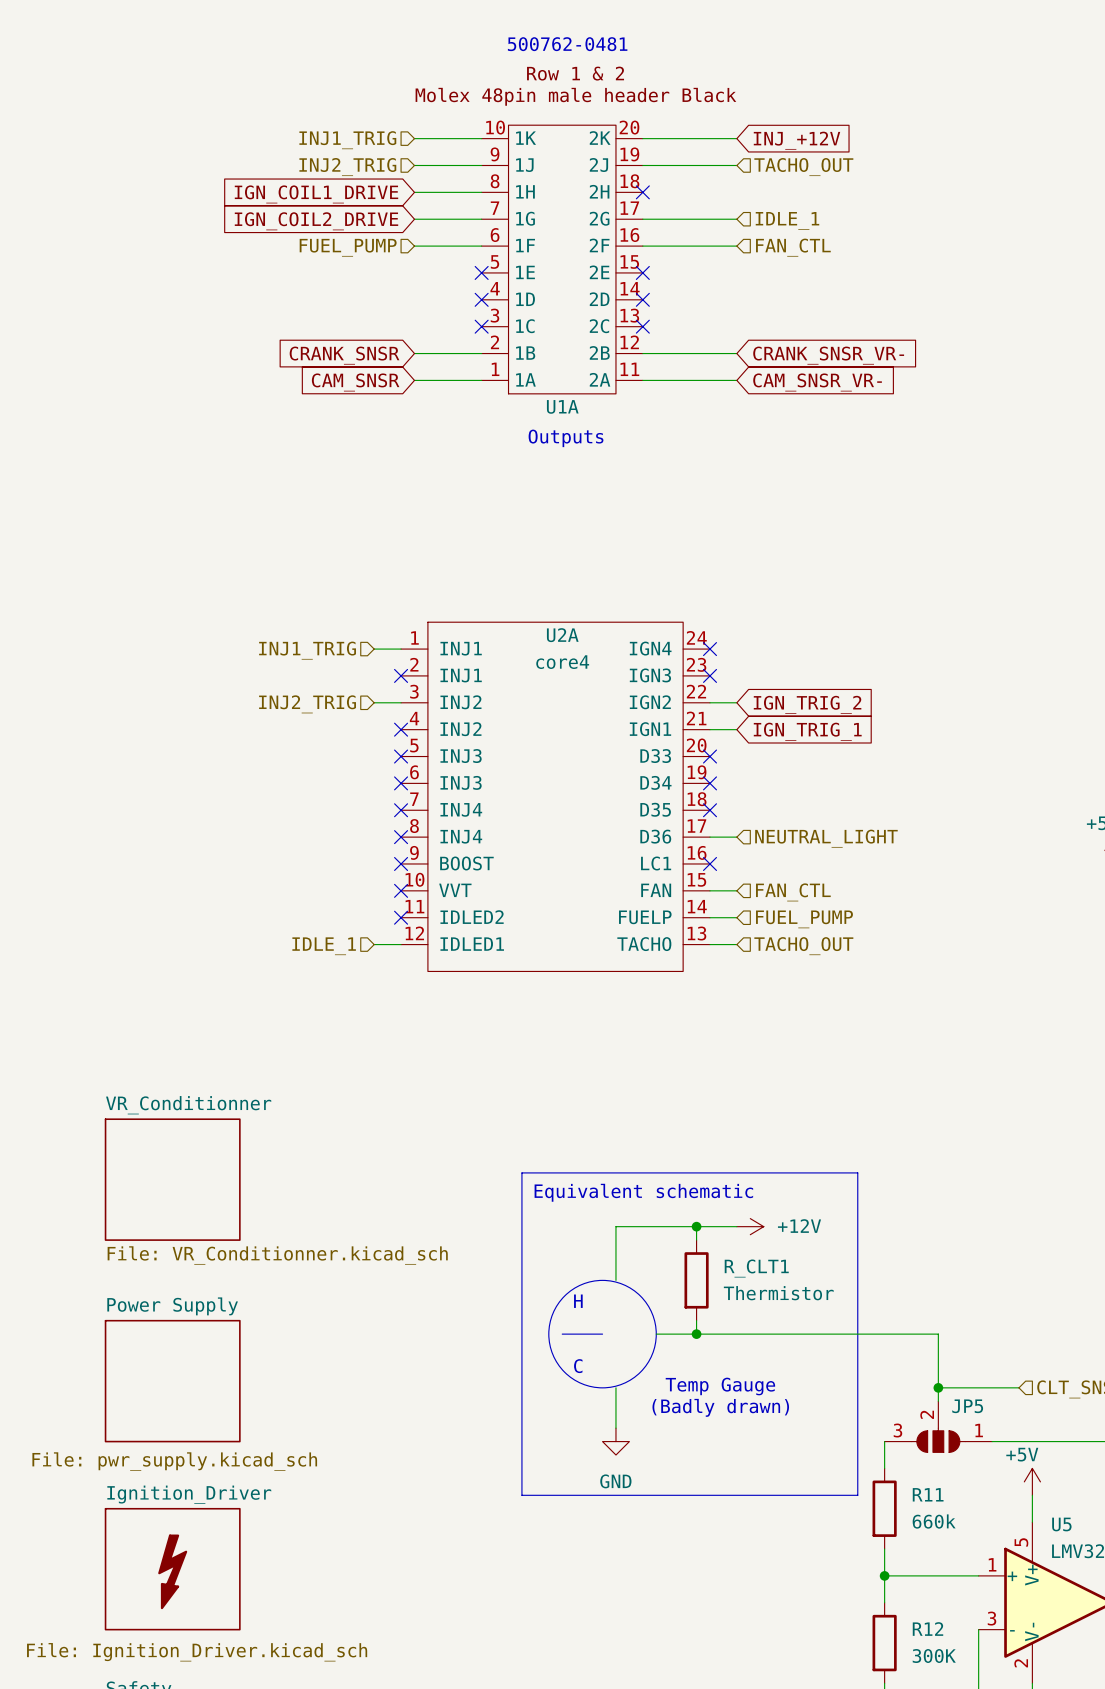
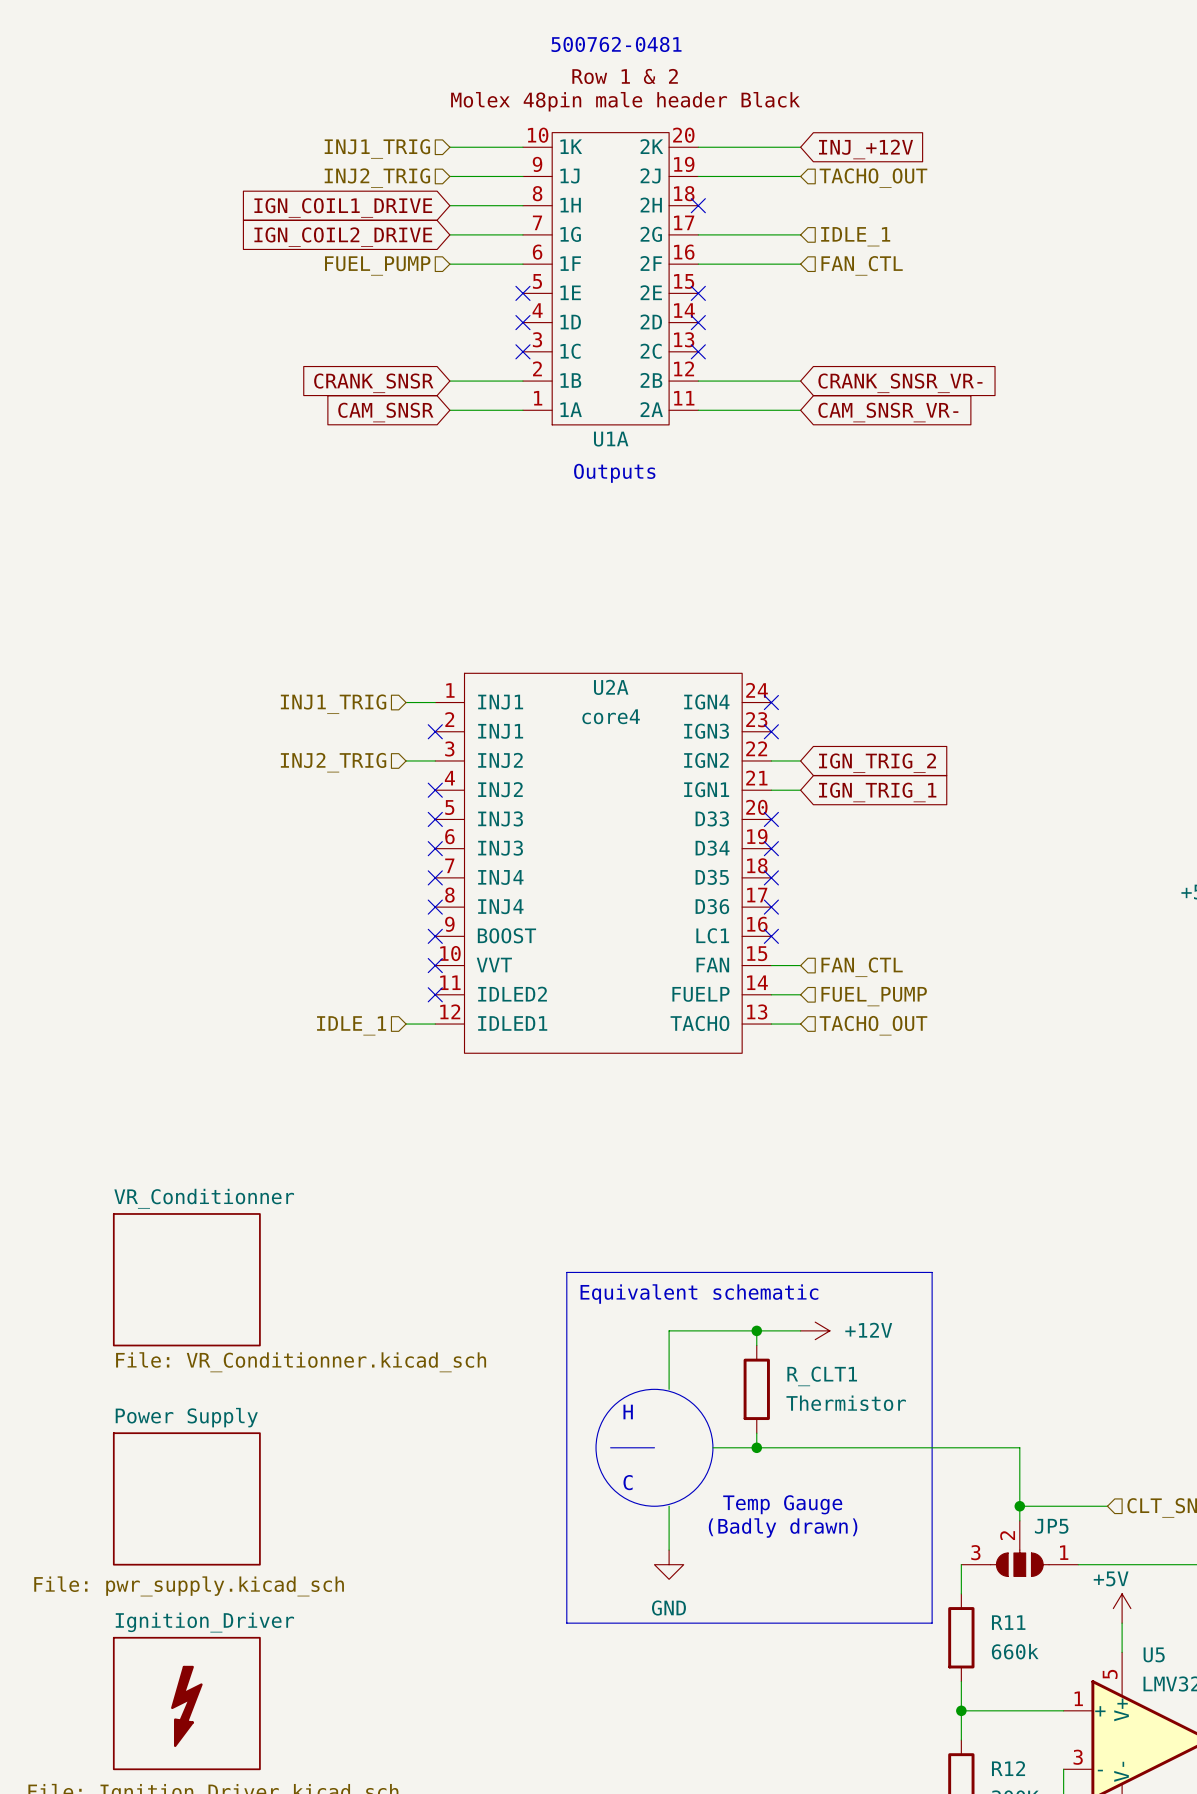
wire: (710, 837) (736, 837) -> none
no-connect mark: none -> (771, 907)
hierarchical label: NEUTRAL_LIGHT (826, 838) -> none

